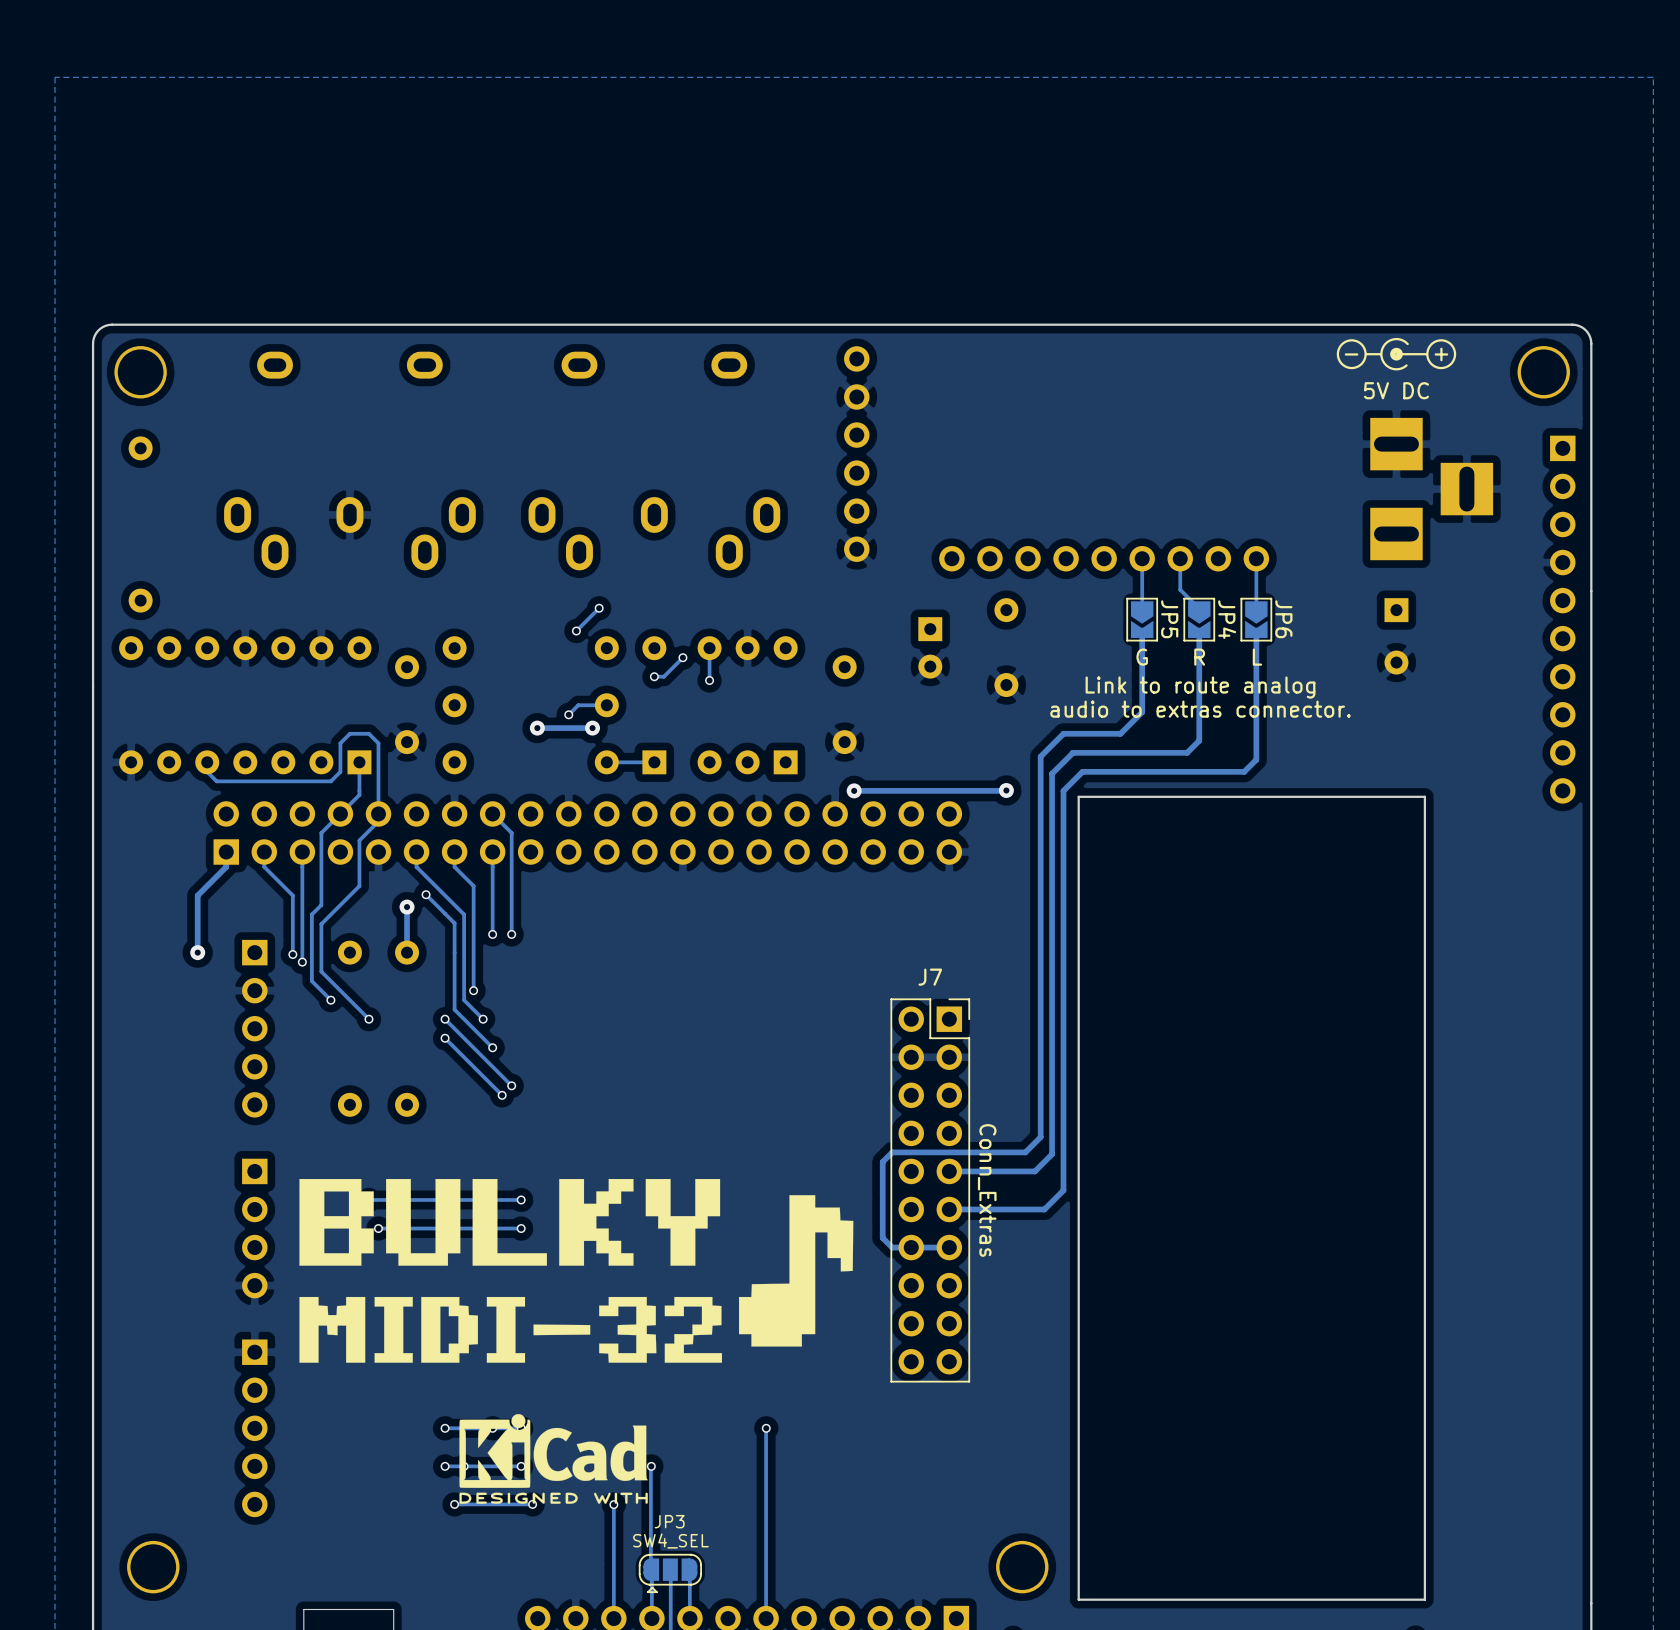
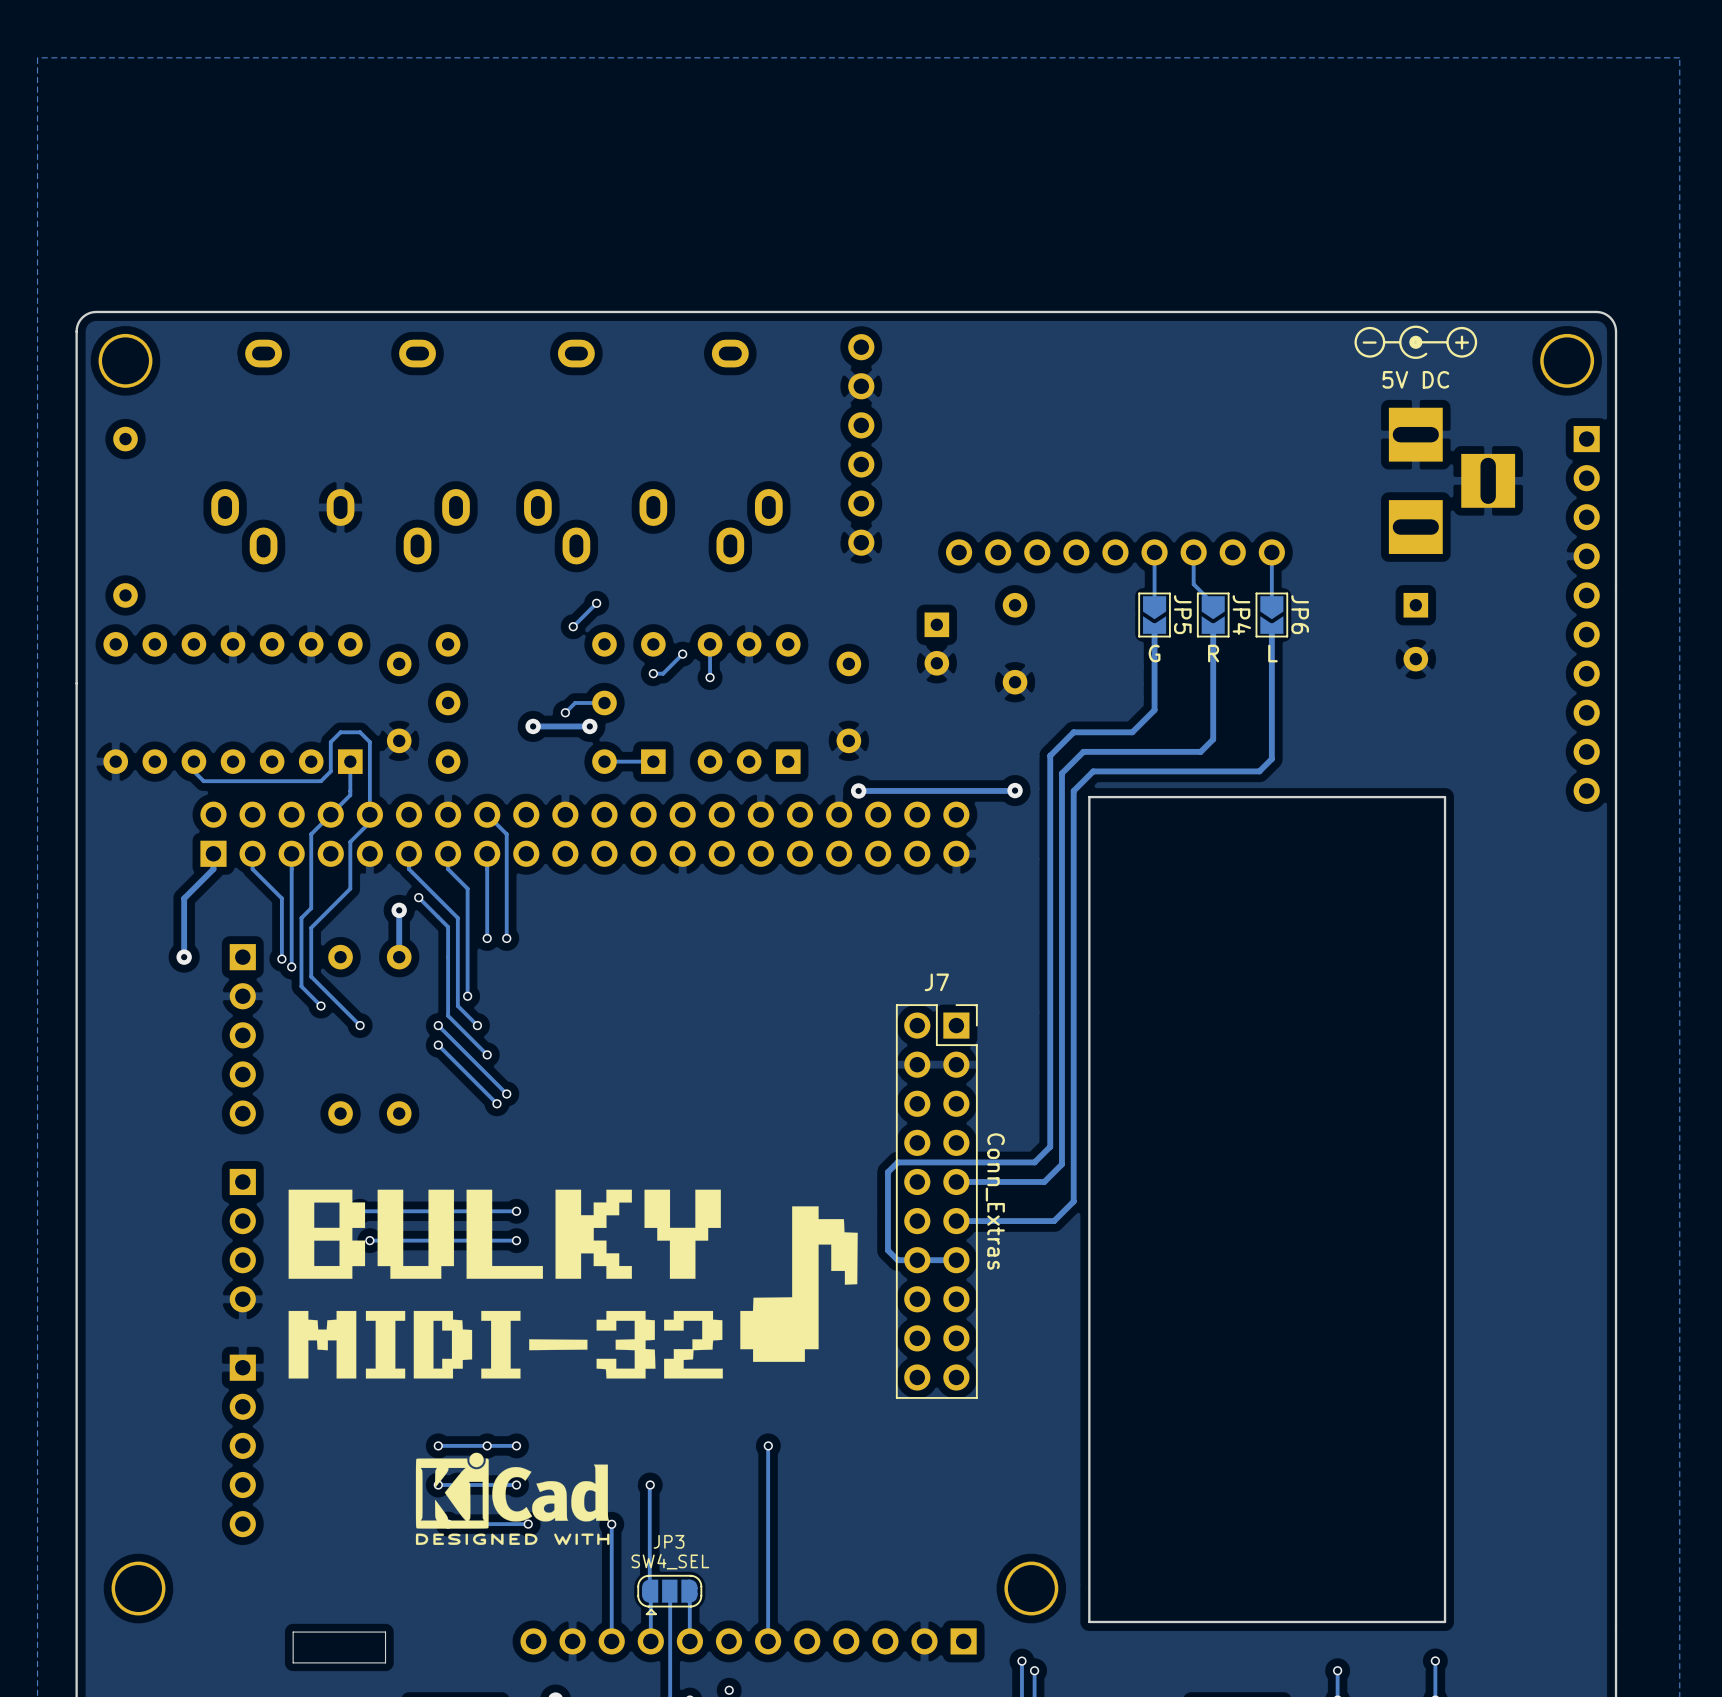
text: Link to route analog (1200, 687) -> none
text: audio to extras connector. (1200, 709) -> none
drawing position: (553, 1458) -> (512, 1498)

